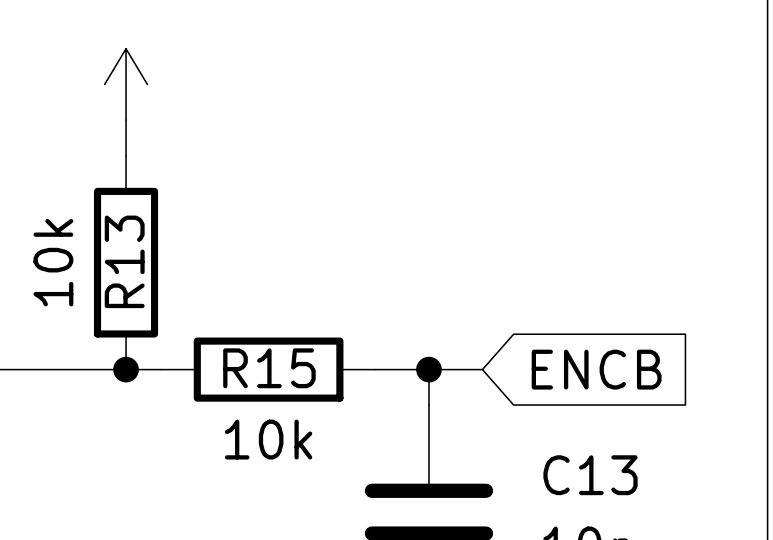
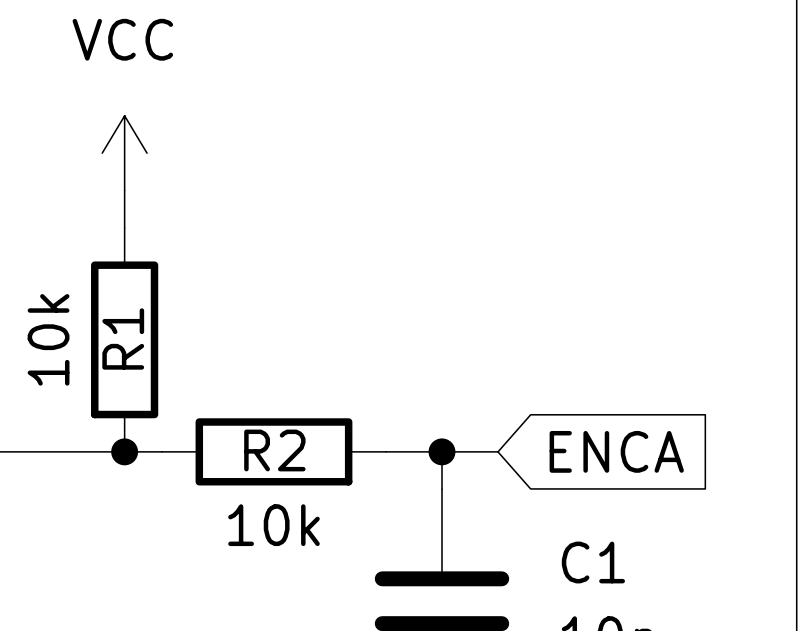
R13 name: R13 (124, 261) -> R1 (123, 338)
R15 name: R15 (269, 368) -> R2 (274, 450)
global label: ENCB (596, 369) -> ENCA (616, 451)
C13 name: C13 (590, 475) -> C1 (593, 562)

